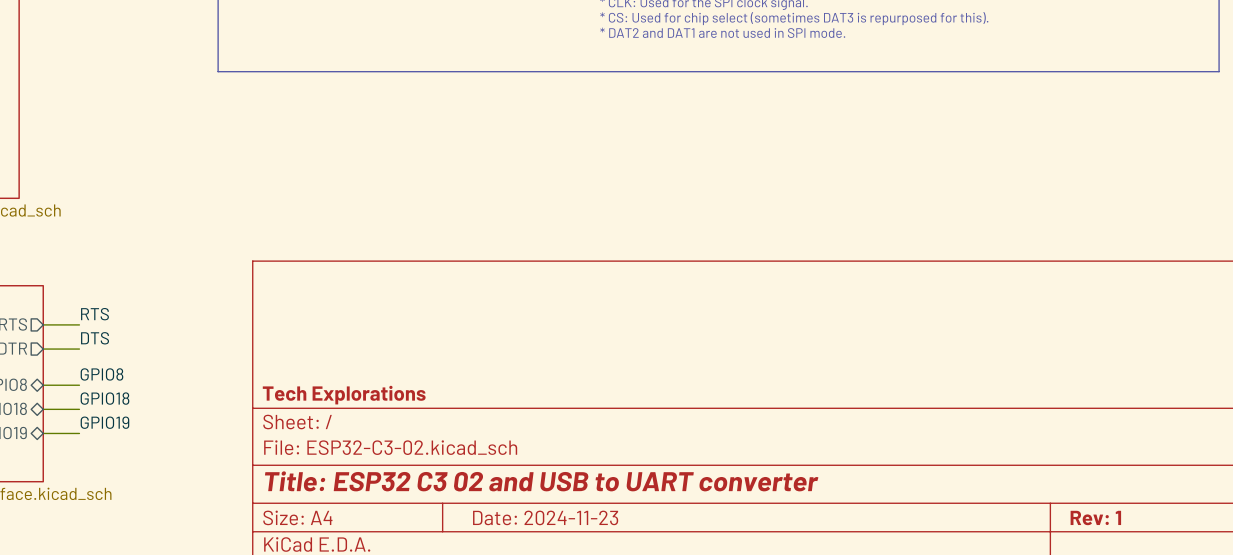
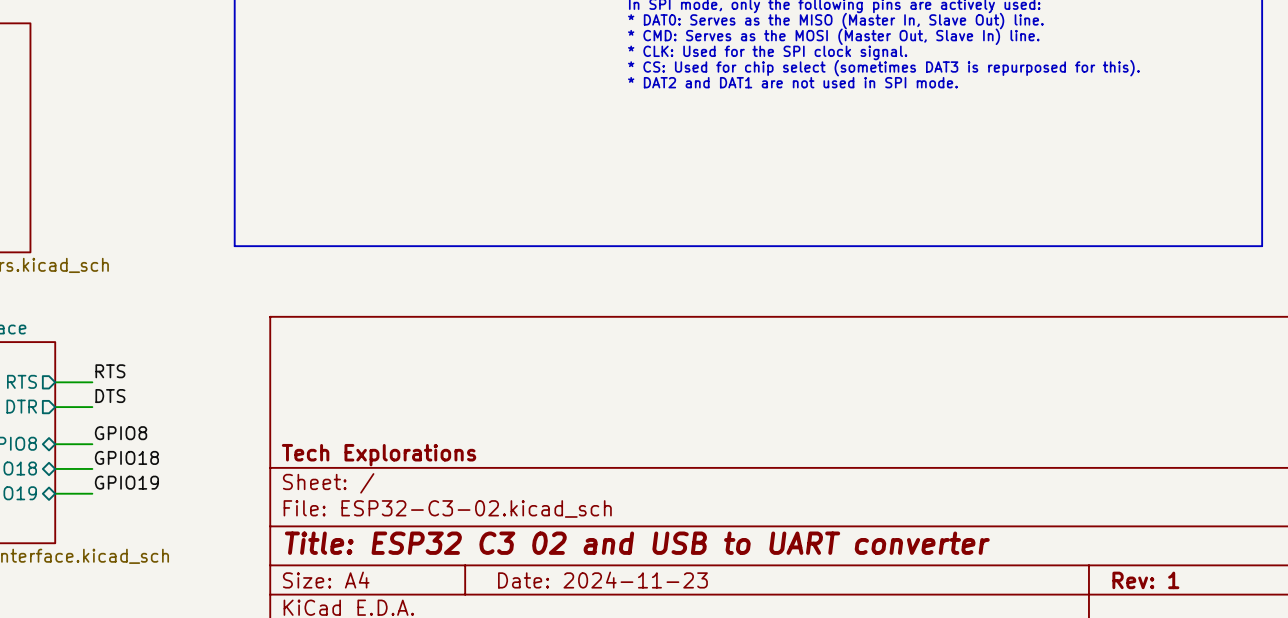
line: (218, 71) (1219, 71) -> (234, 122) (234, 246) (1262, 246) (1262, 122)

